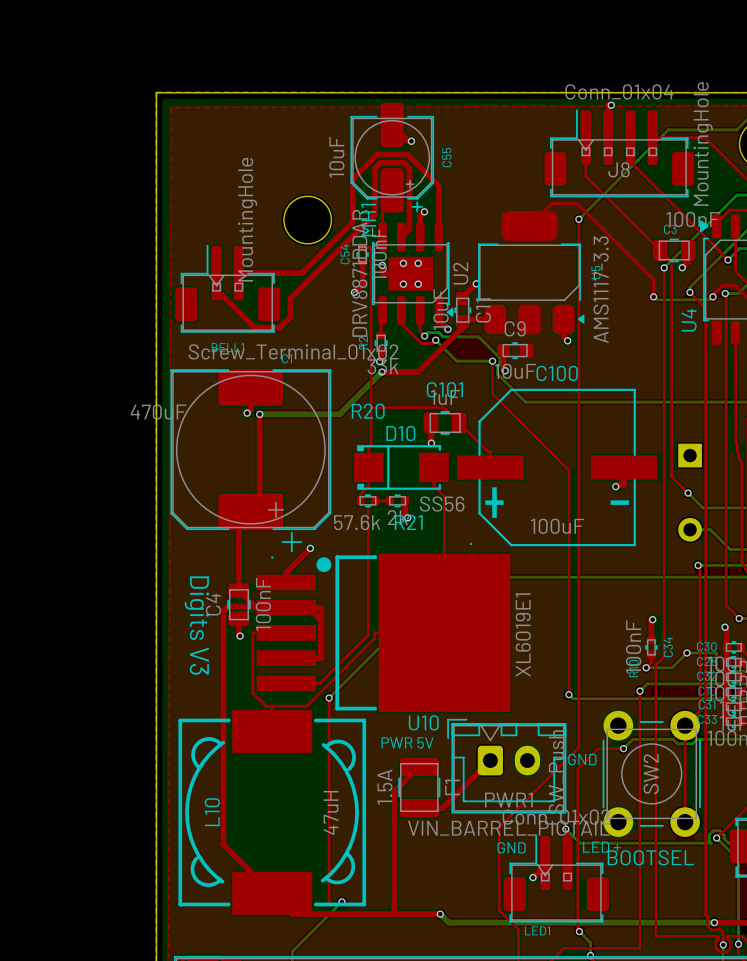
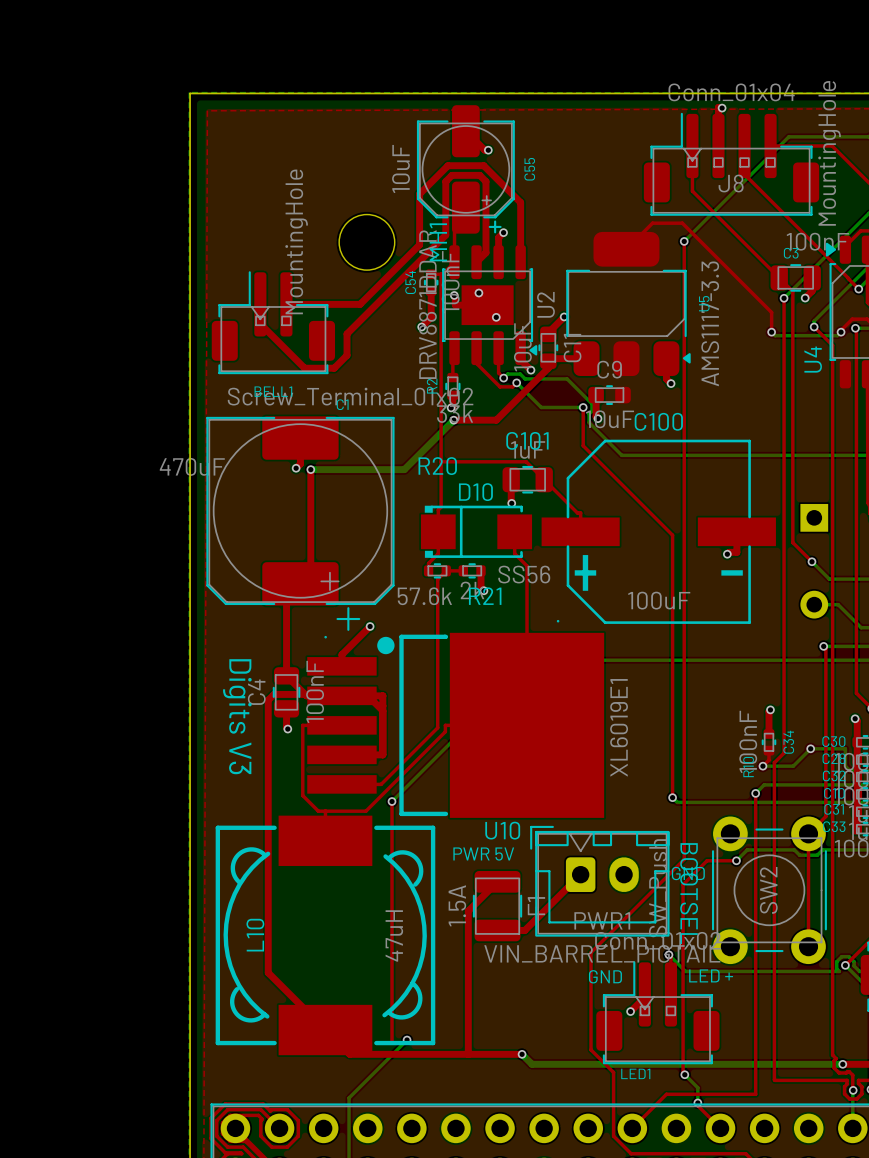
via: (418, 263) -> none
via: (403, 284) -> none
text rotation: 0° (650, 857) -> 90° clockwise (689, 893)

